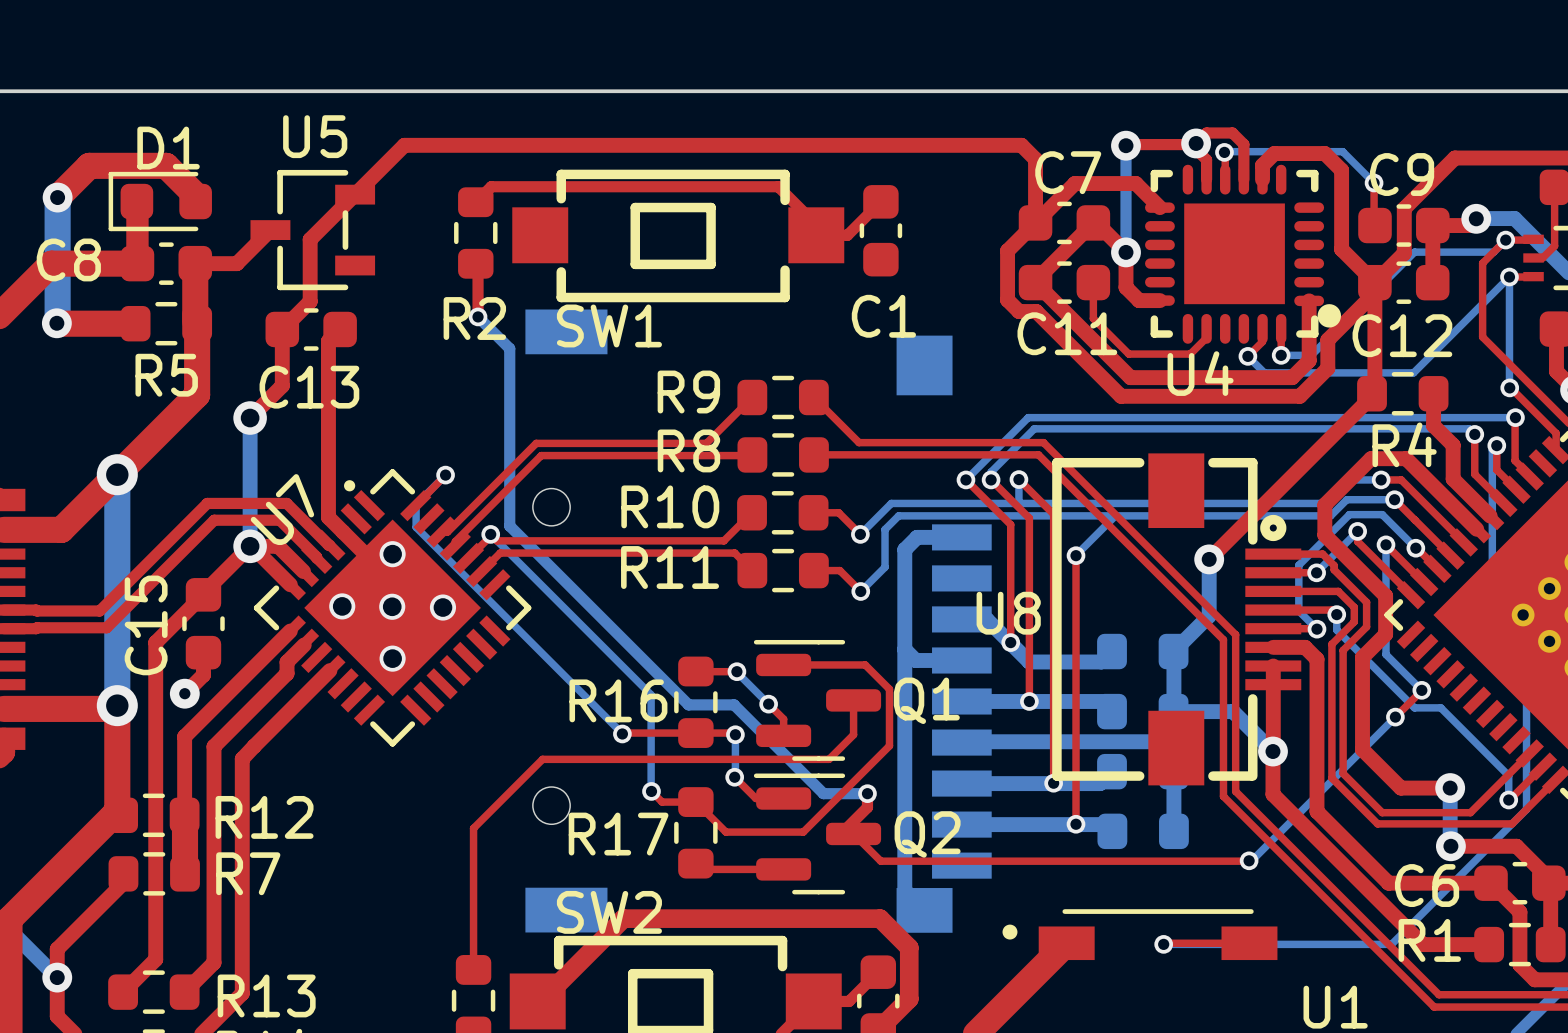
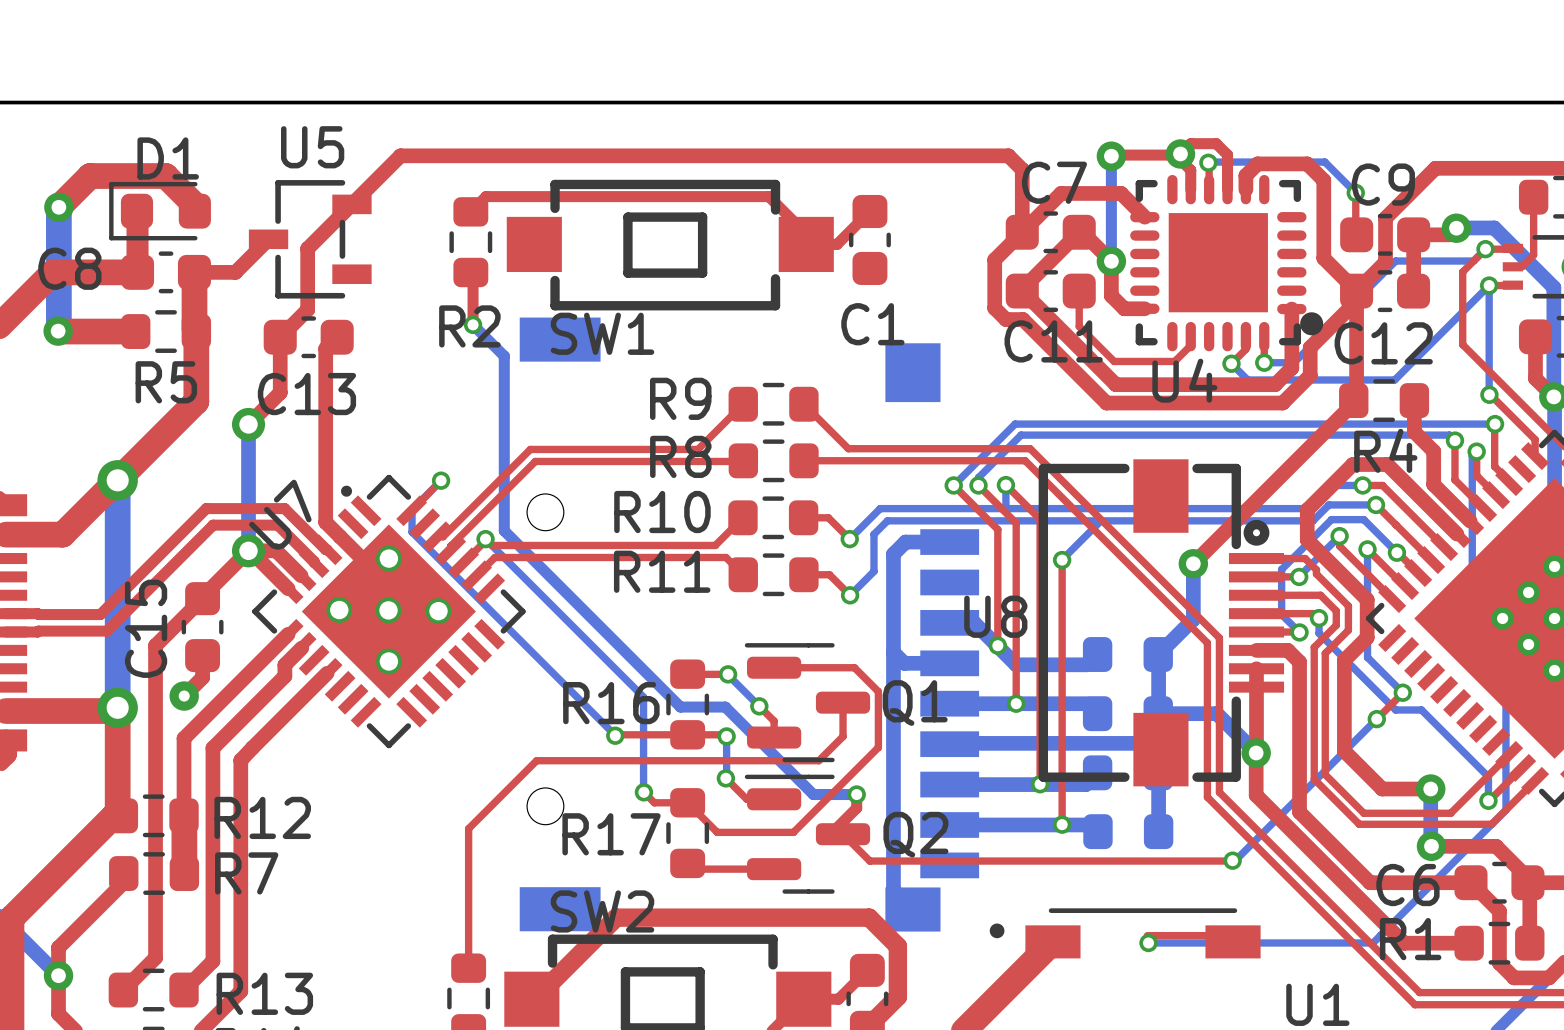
top track: none -> (1147, 935) (1229, 935)
top track: (1249, 943) (1163, 944) -> none

